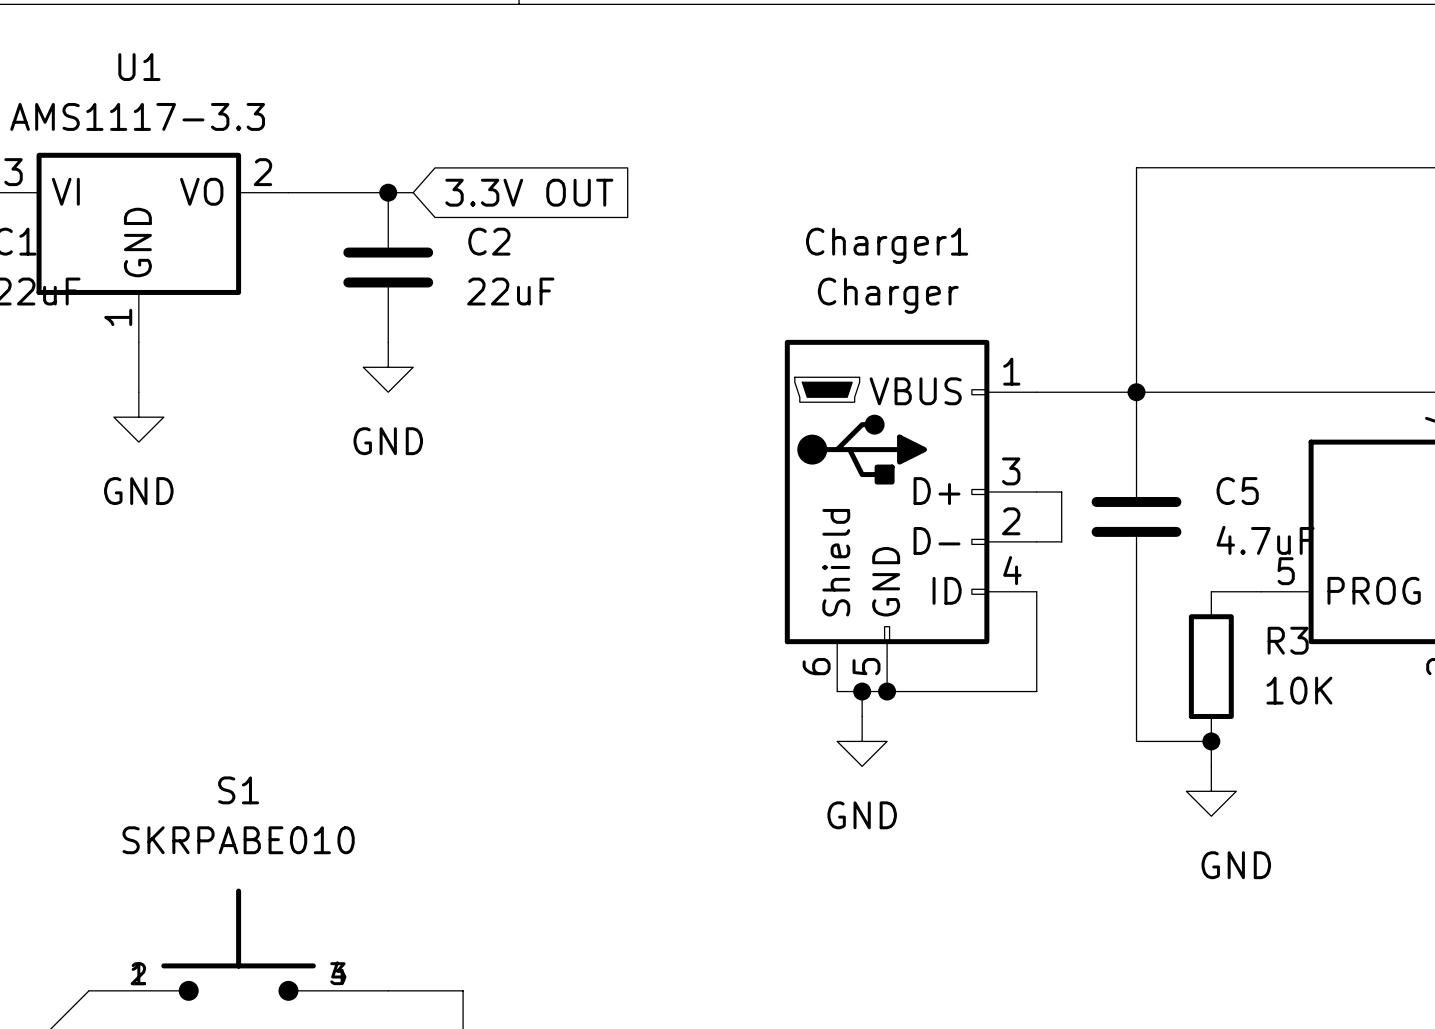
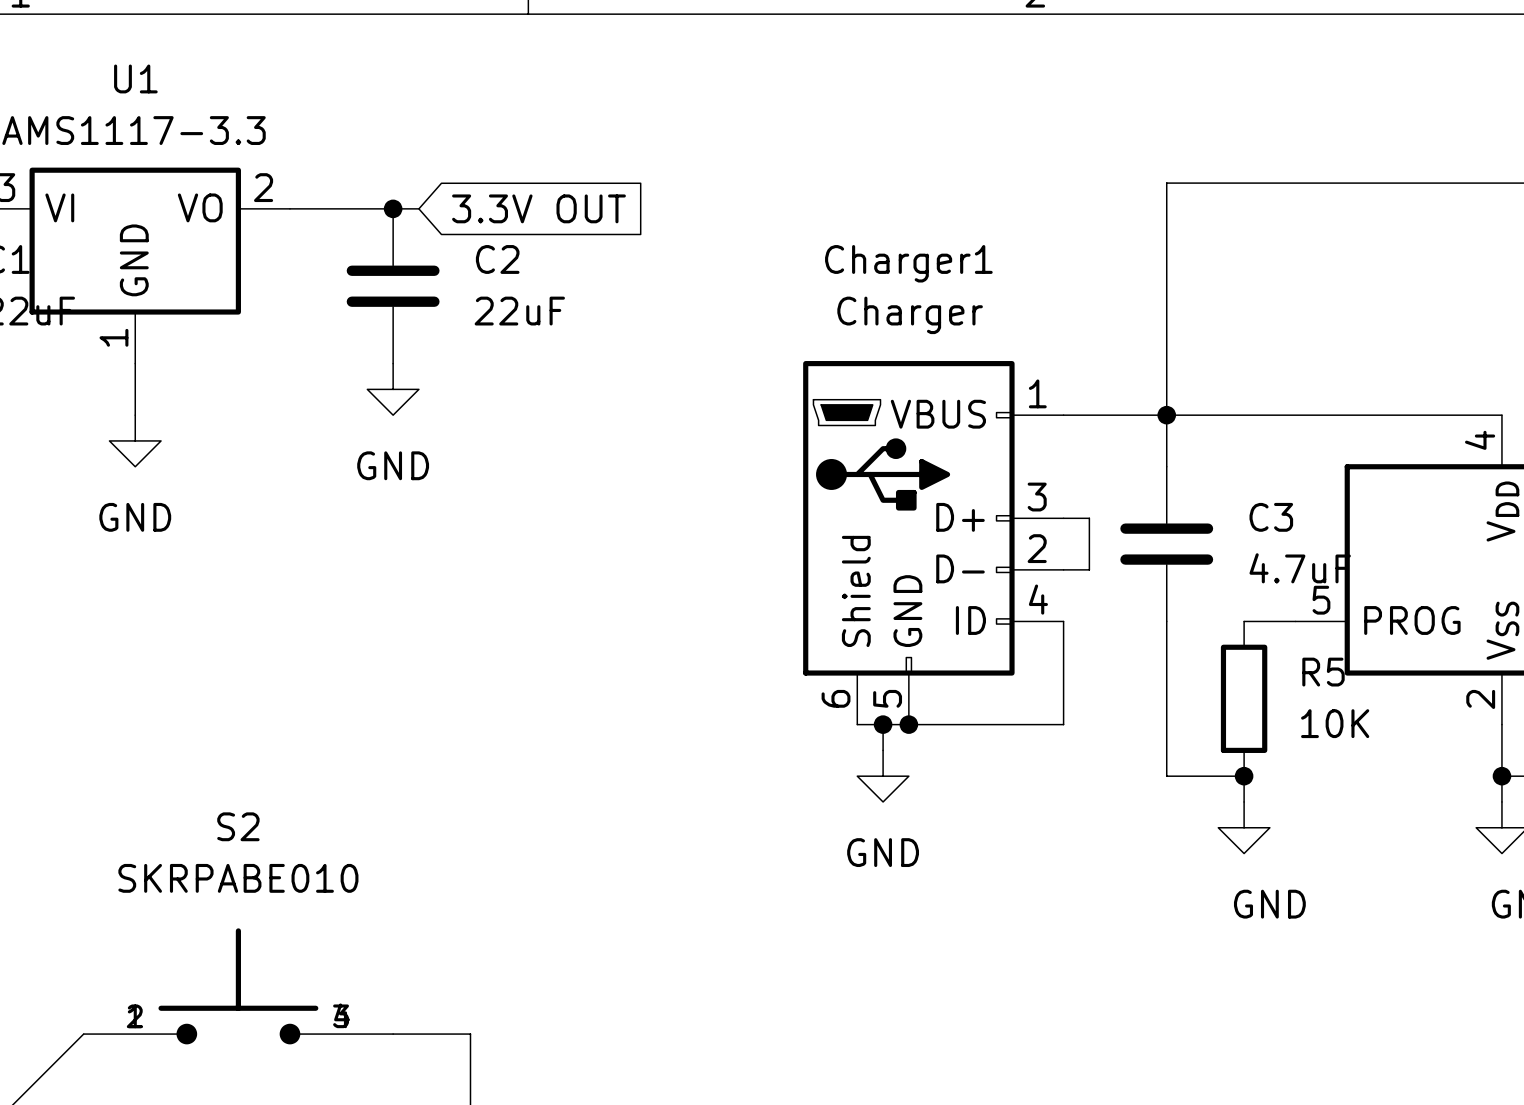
C5 name: C5 (1237, 491) -> C3 (1271, 517)
R3 name: R3 (1288, 640) -> R5 (1323, 672)
S1 name: S1 (238, 790) -> S2 (238, 826)

